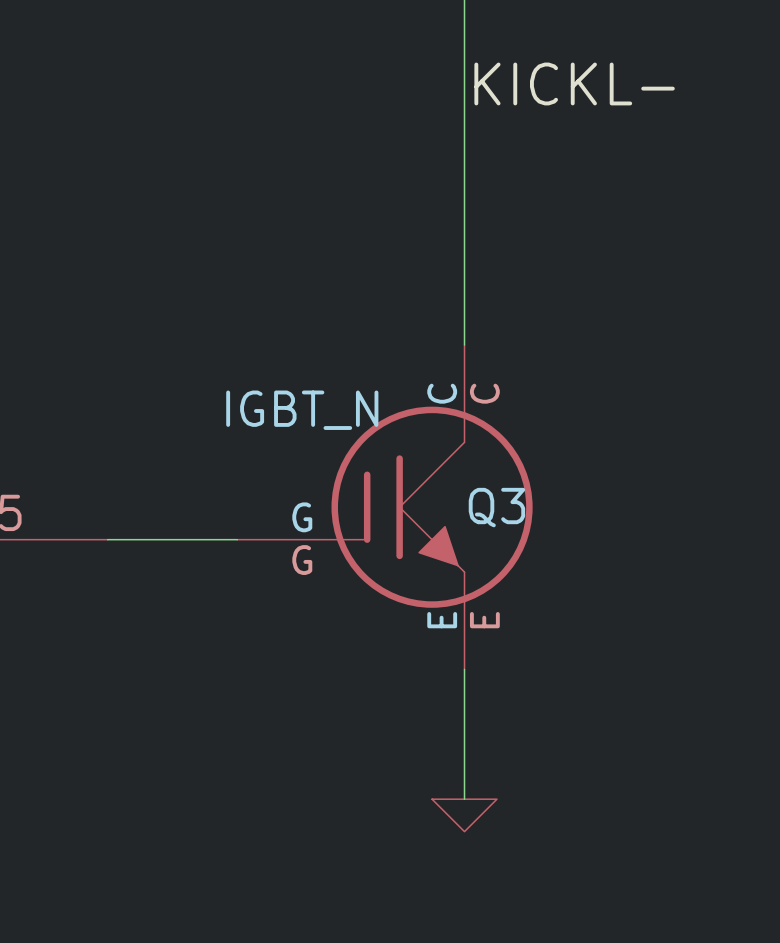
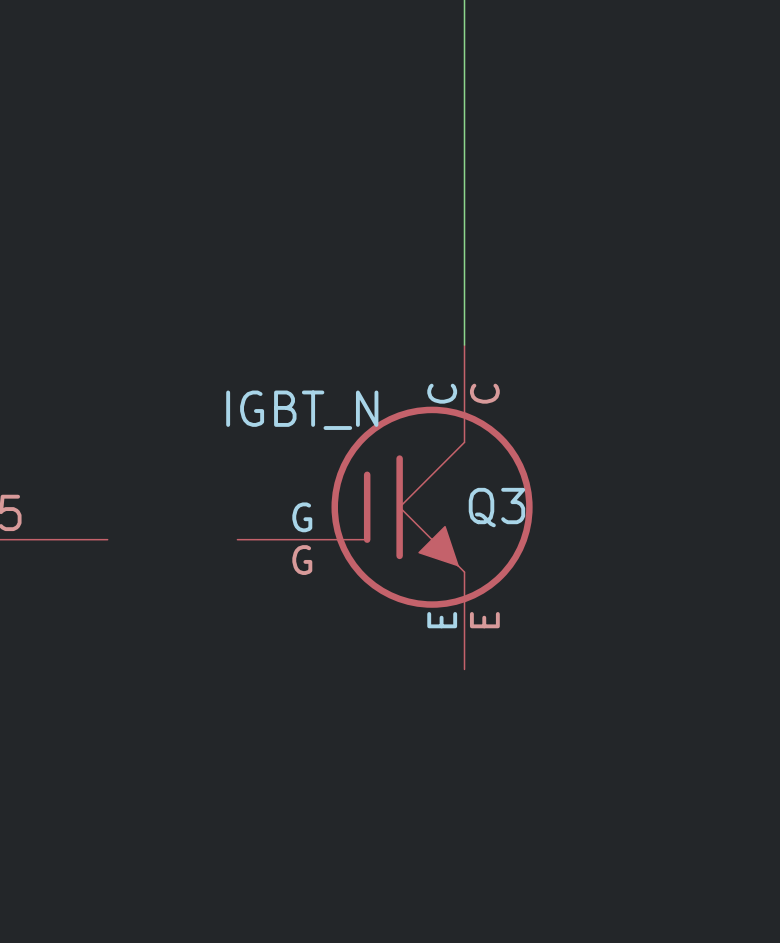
label: KICKL- (574, 83) -> none
wire: (107, 539) (237, 539) -> none
wire: (464, 669) (464, 799) -> none
power symbol: (464, 815) -> none

